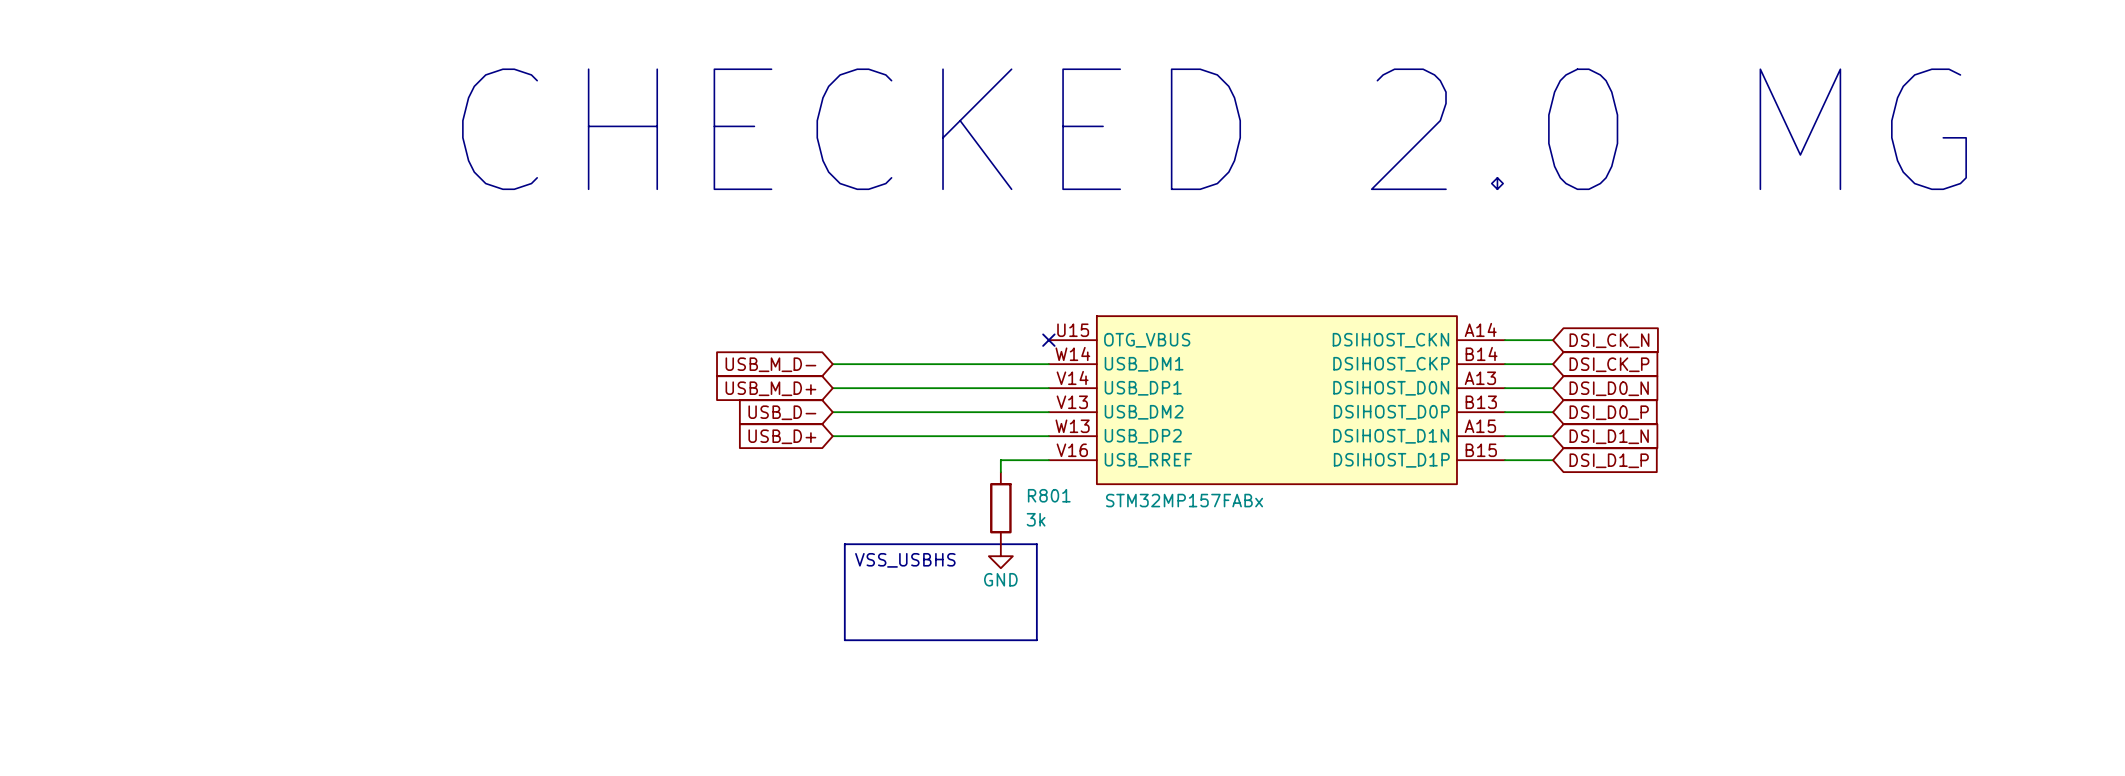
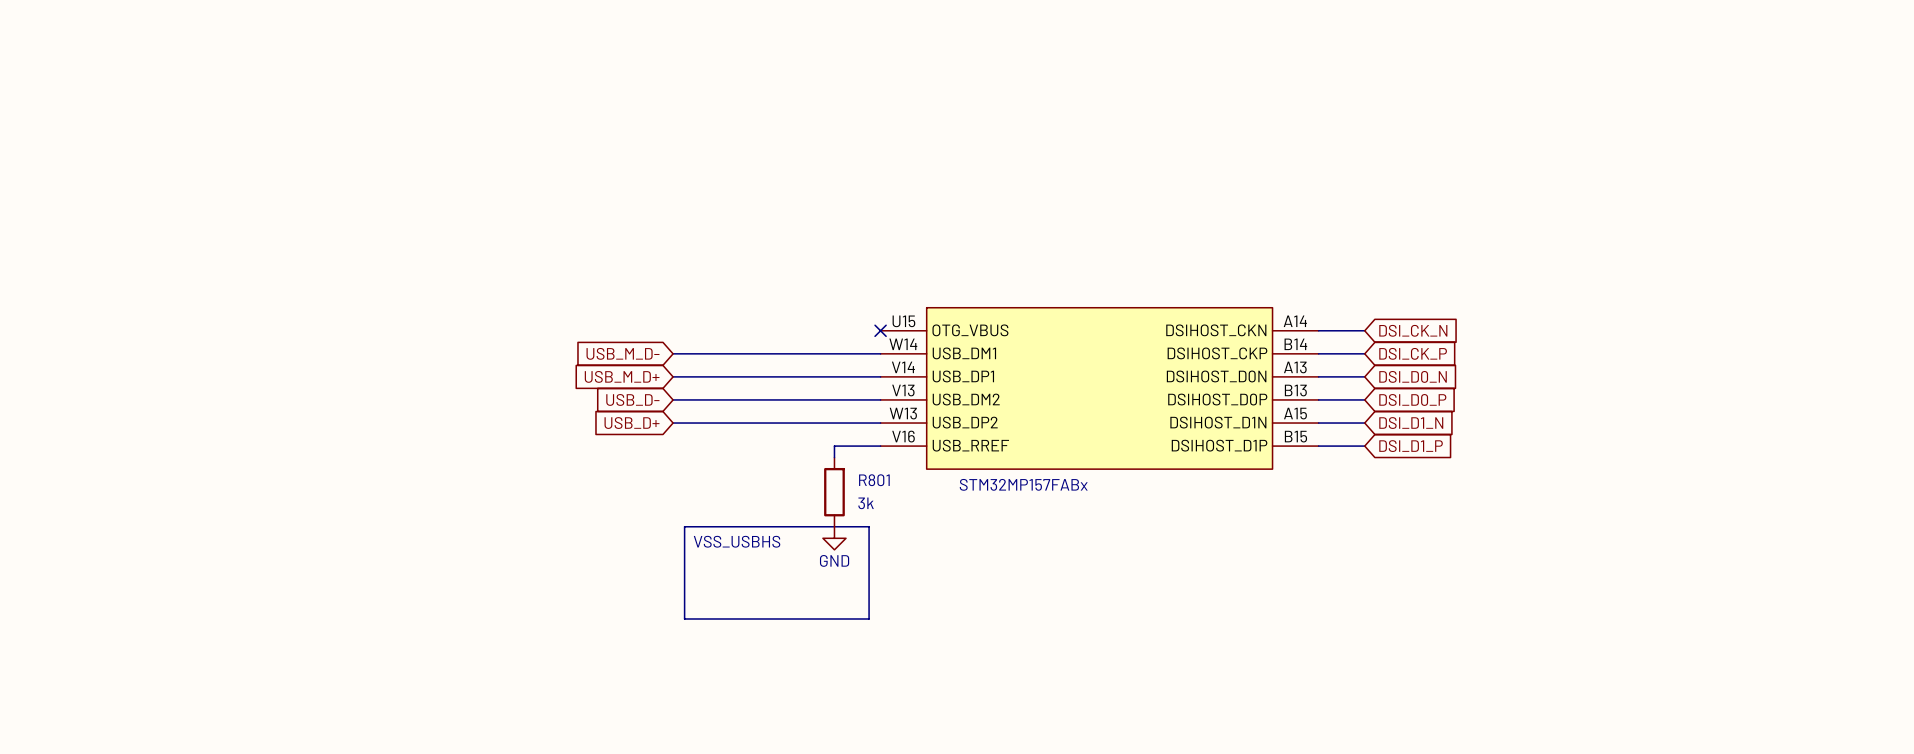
text: CHECKED 2.0 MG (1214, 129) -> none

